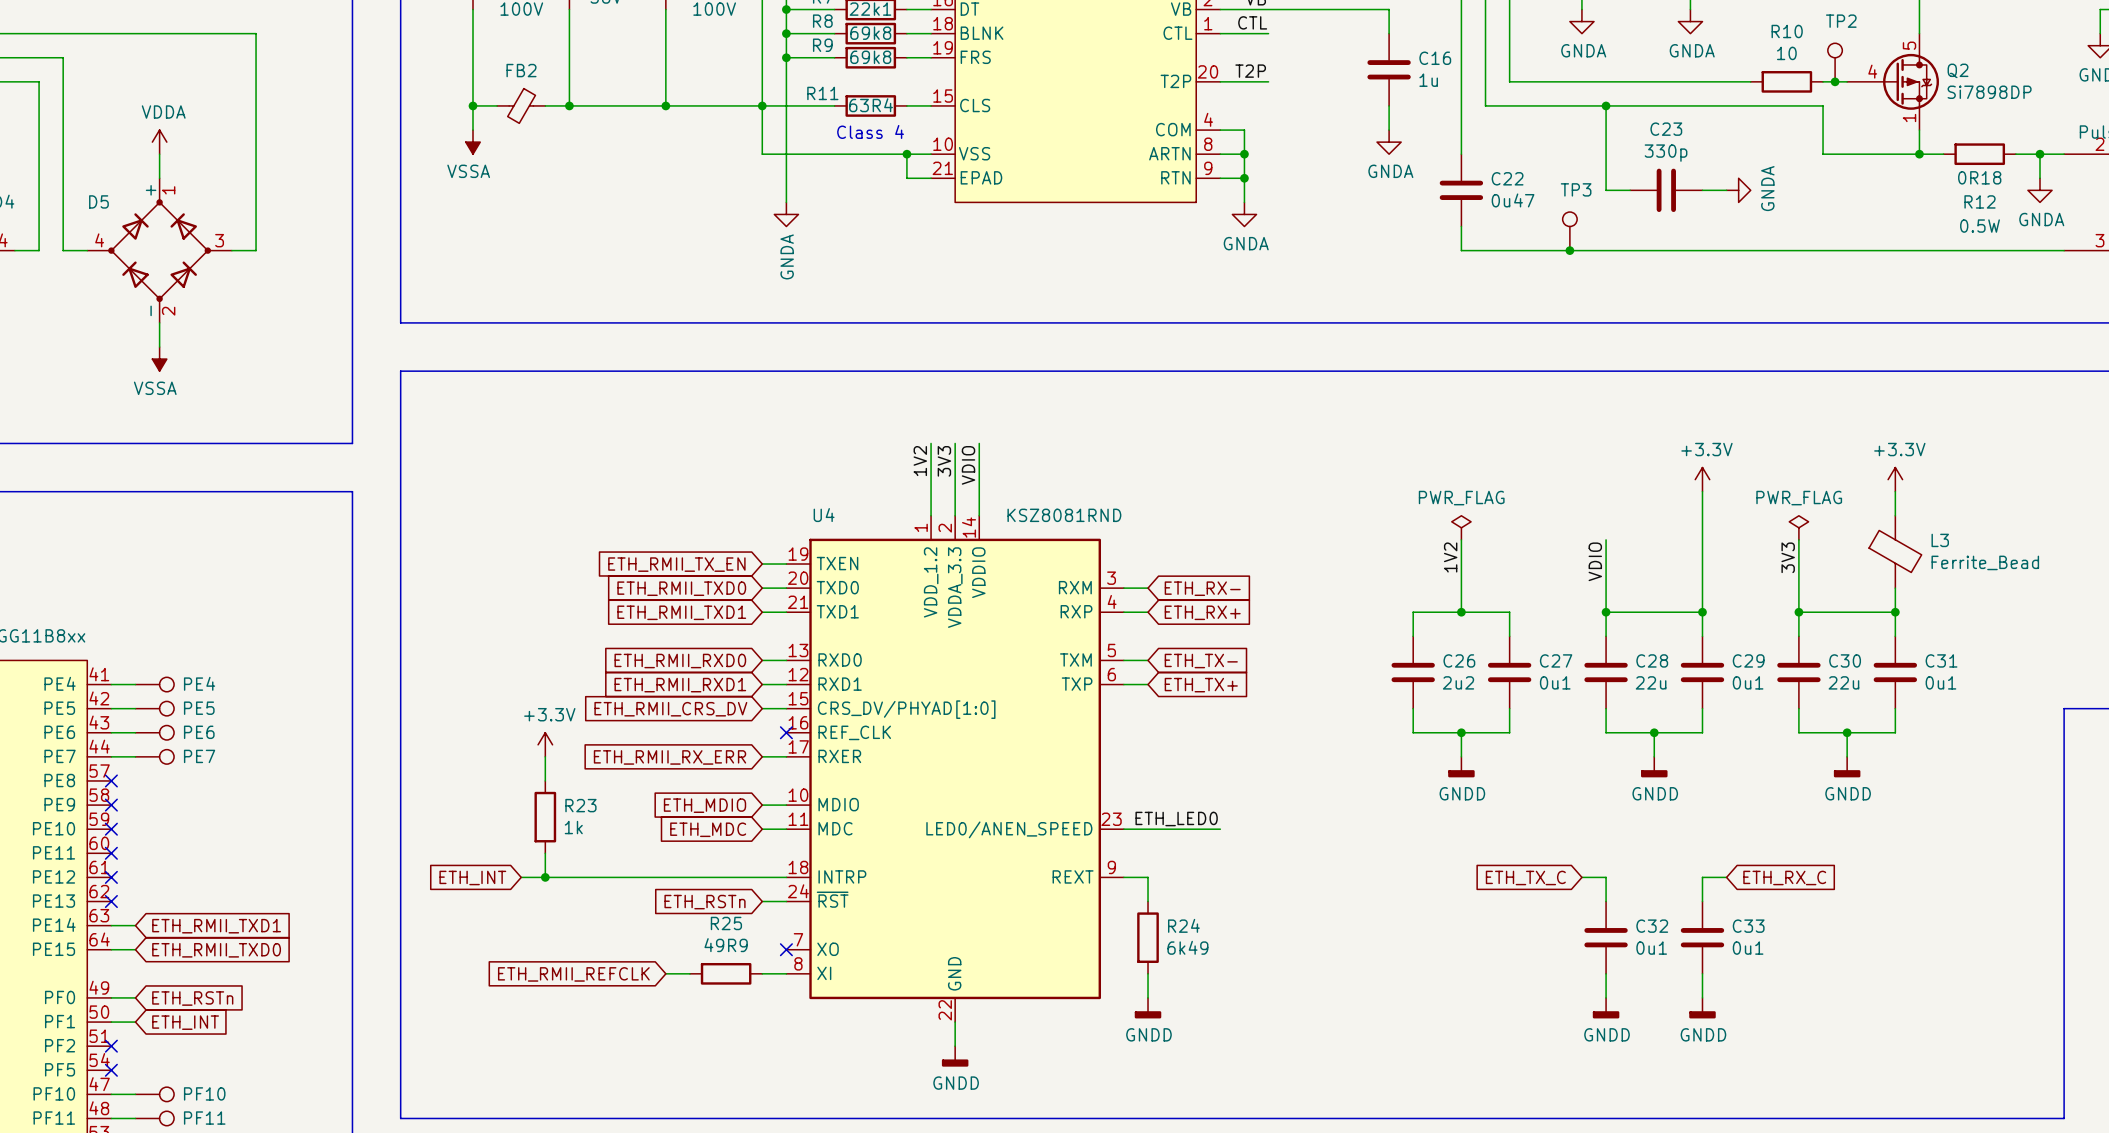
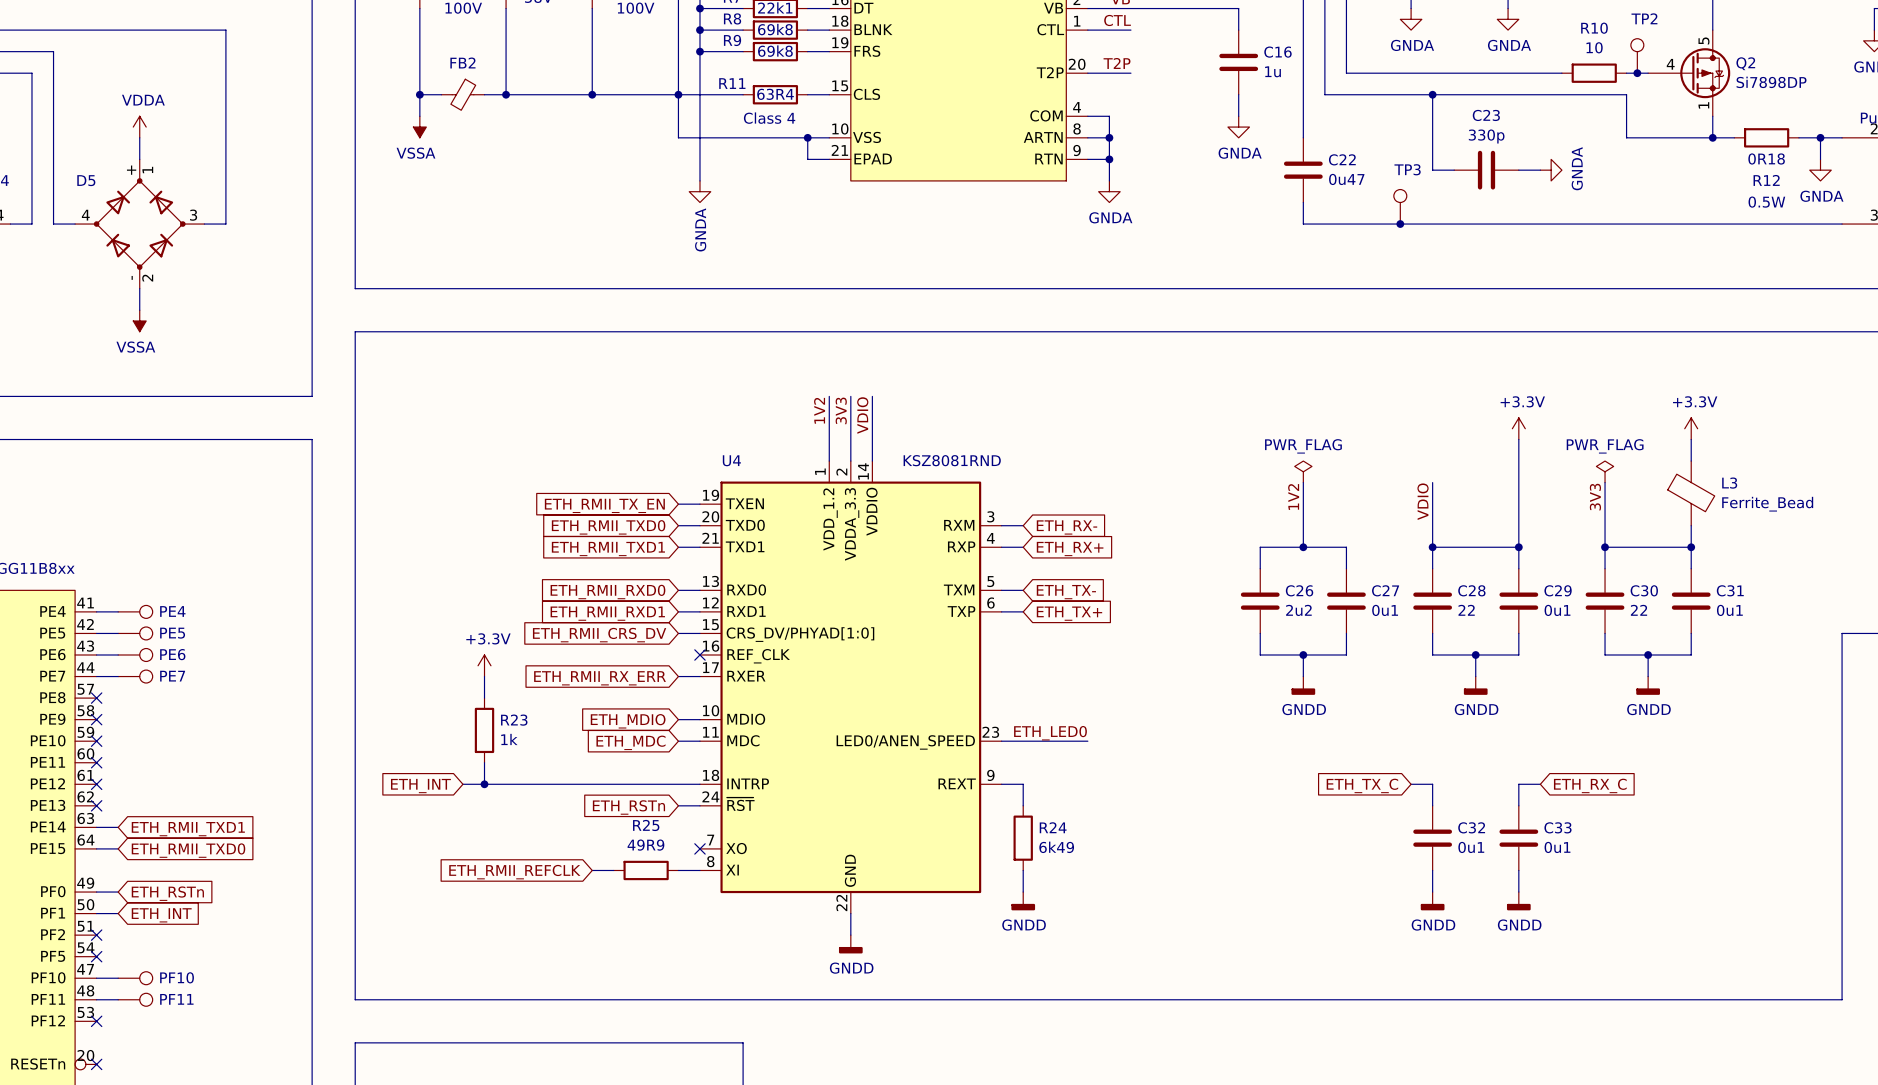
C28 value: 22u (1651, 682) -> 22 (1466, 610)
C30 value: 22u (1843, 682) -> 22 (1639, 610)

